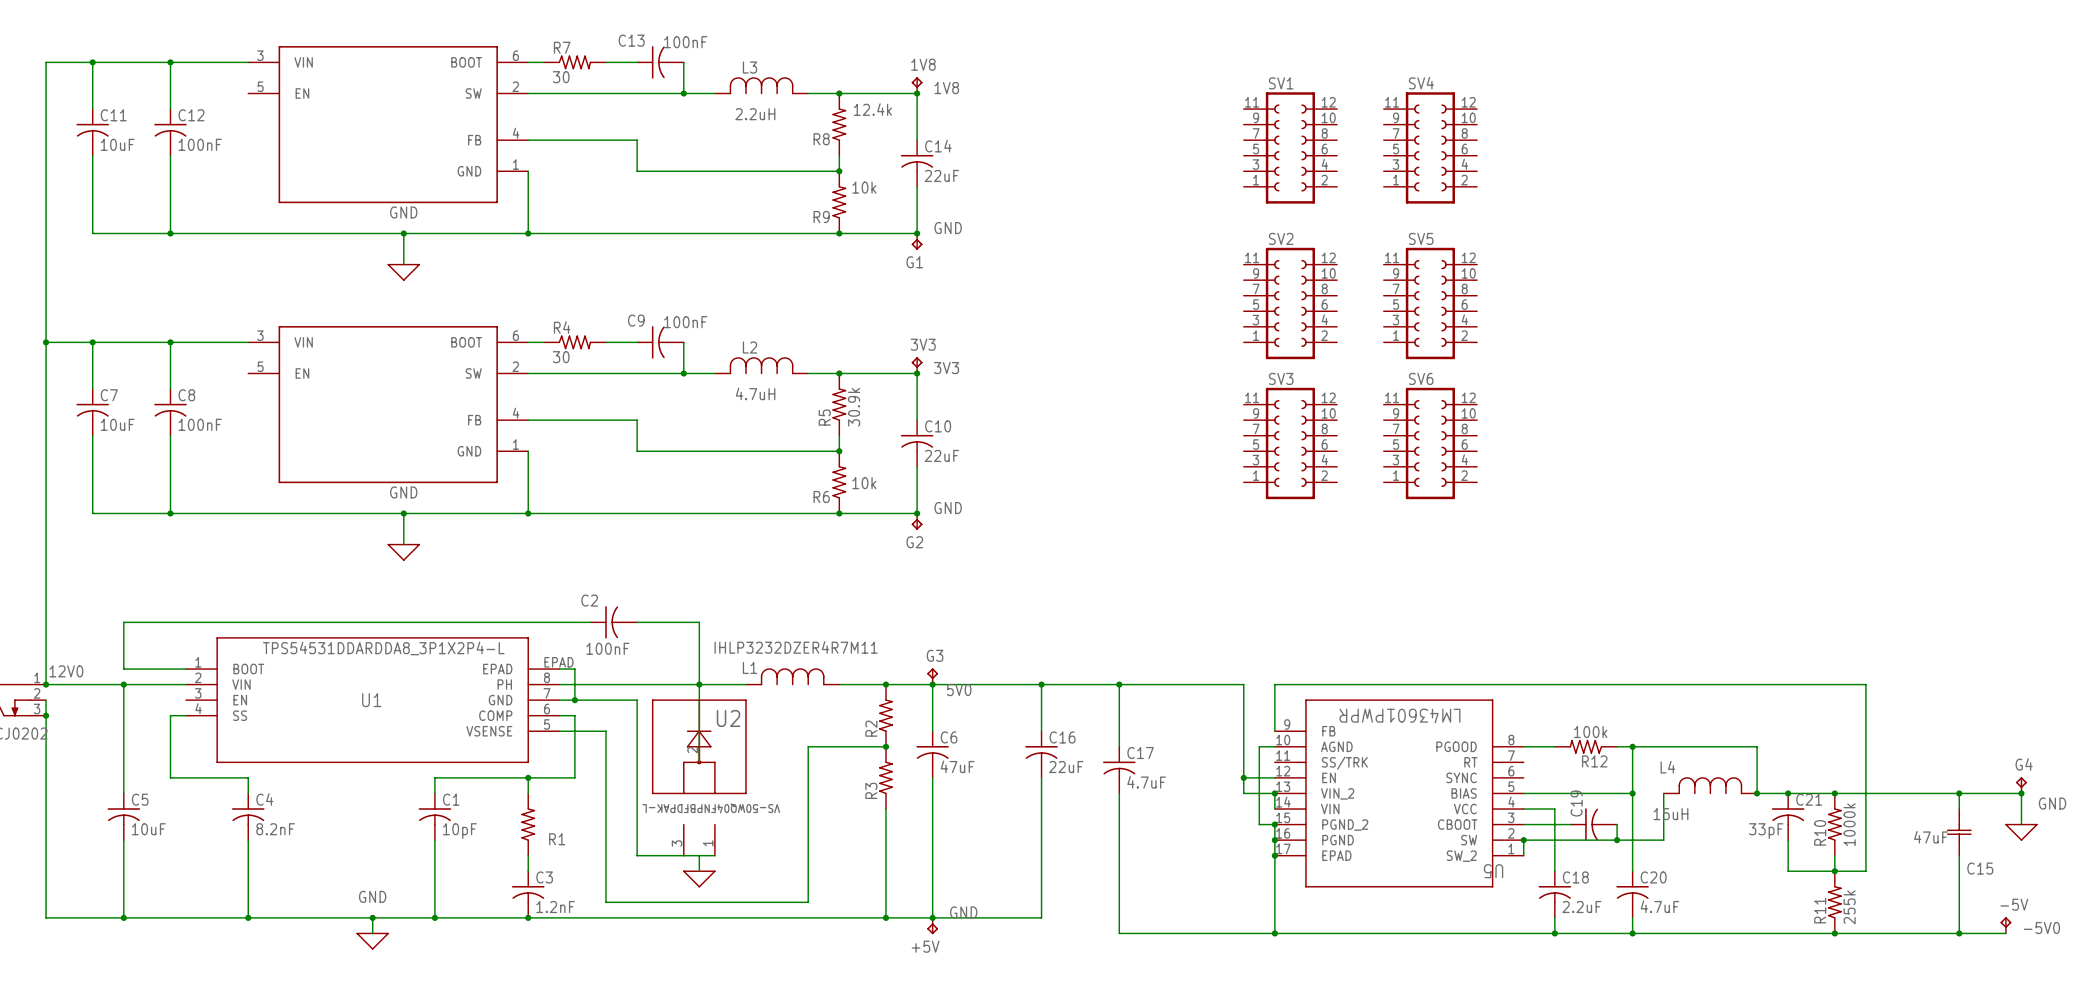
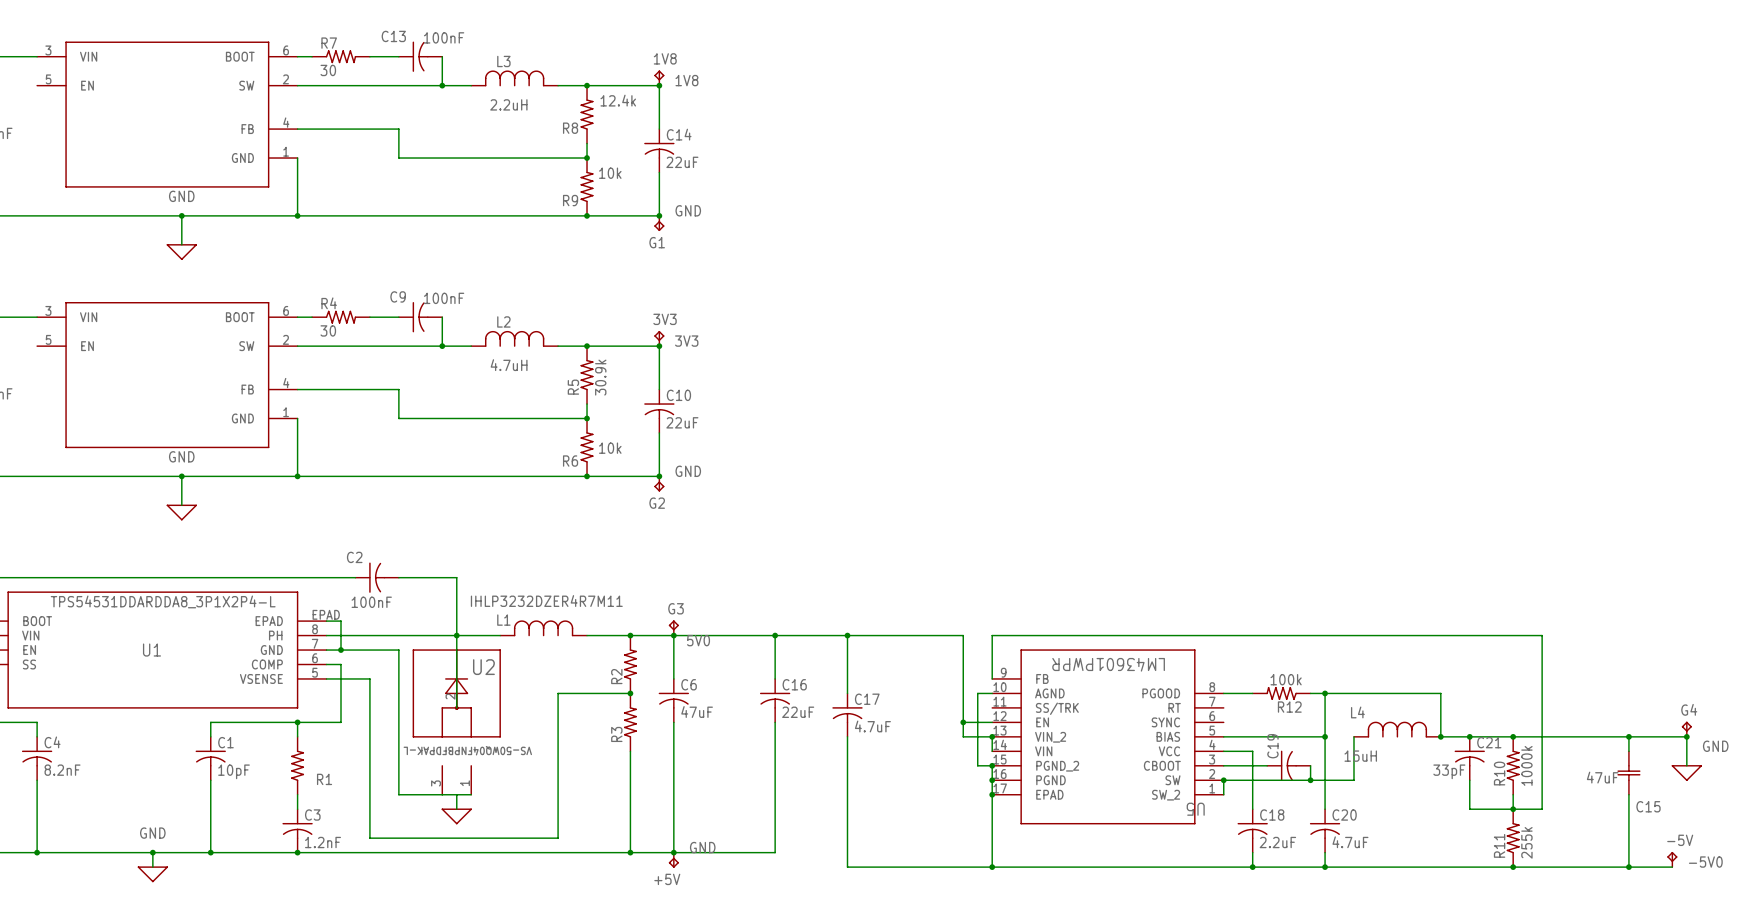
SV1: (1290, 147) -> none
SV4: (1430, 147) -> none
SV2: (1290, 303) -> none
SV5: (1430, 303) -> none
SV3: (1290, 443) -> none
SV6: (1430, 443) -> none

